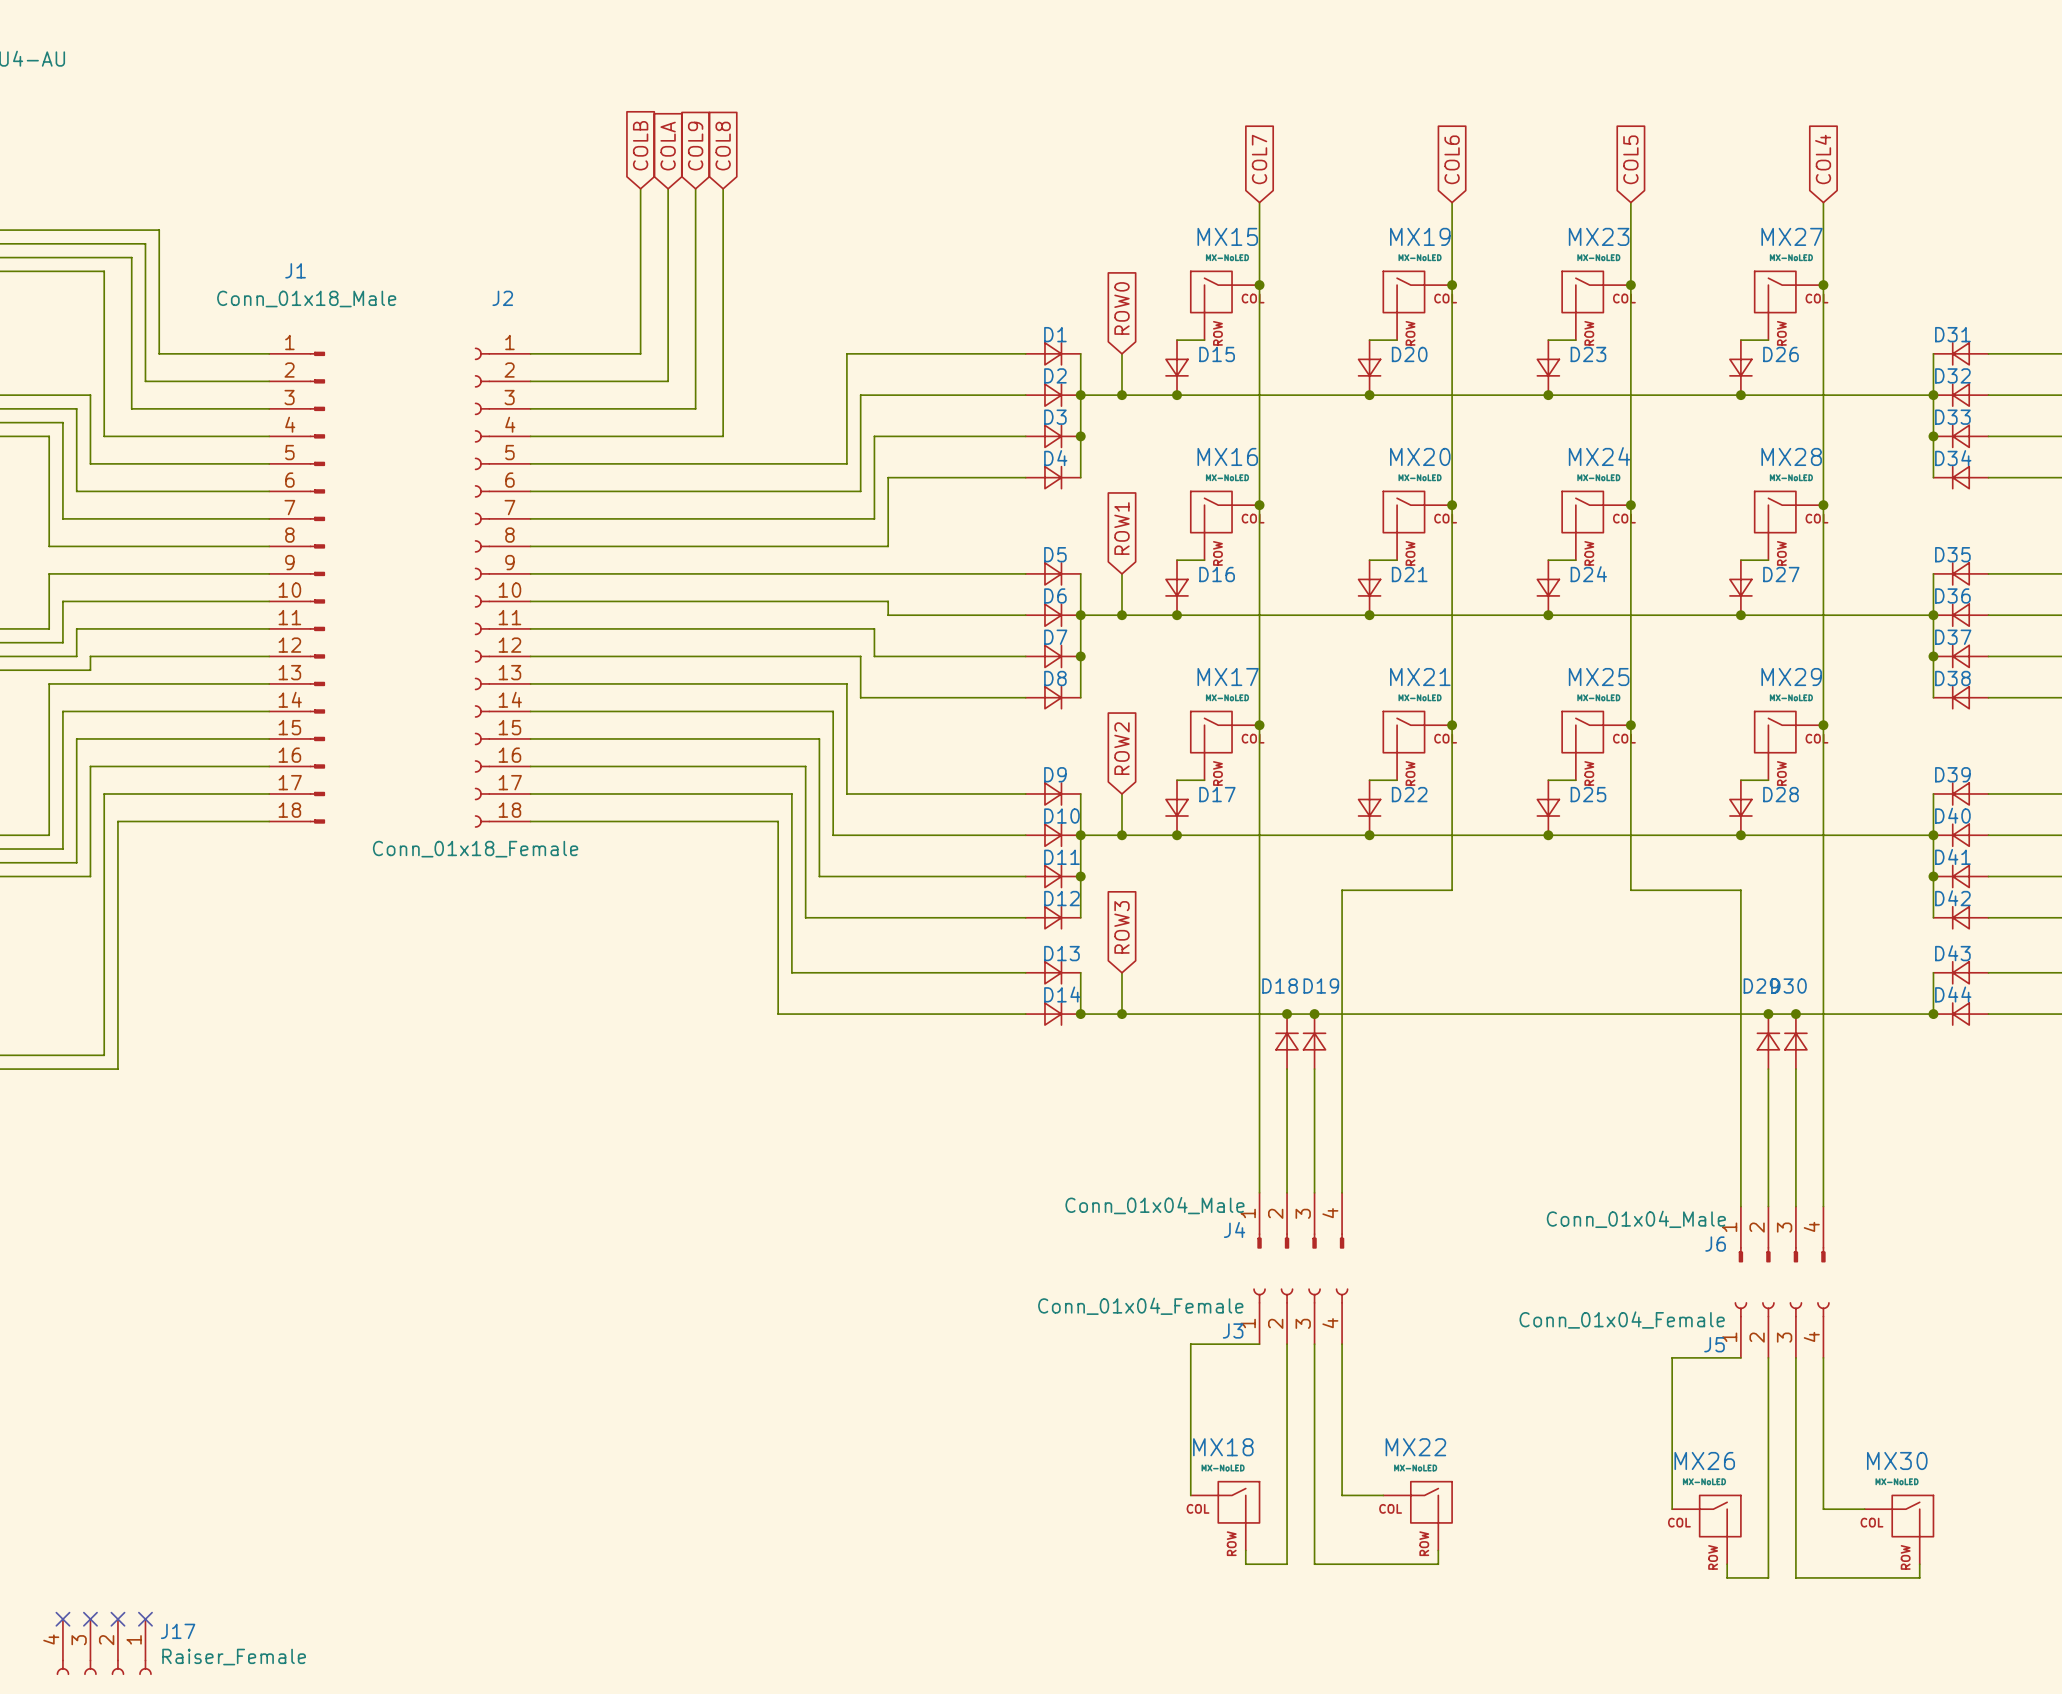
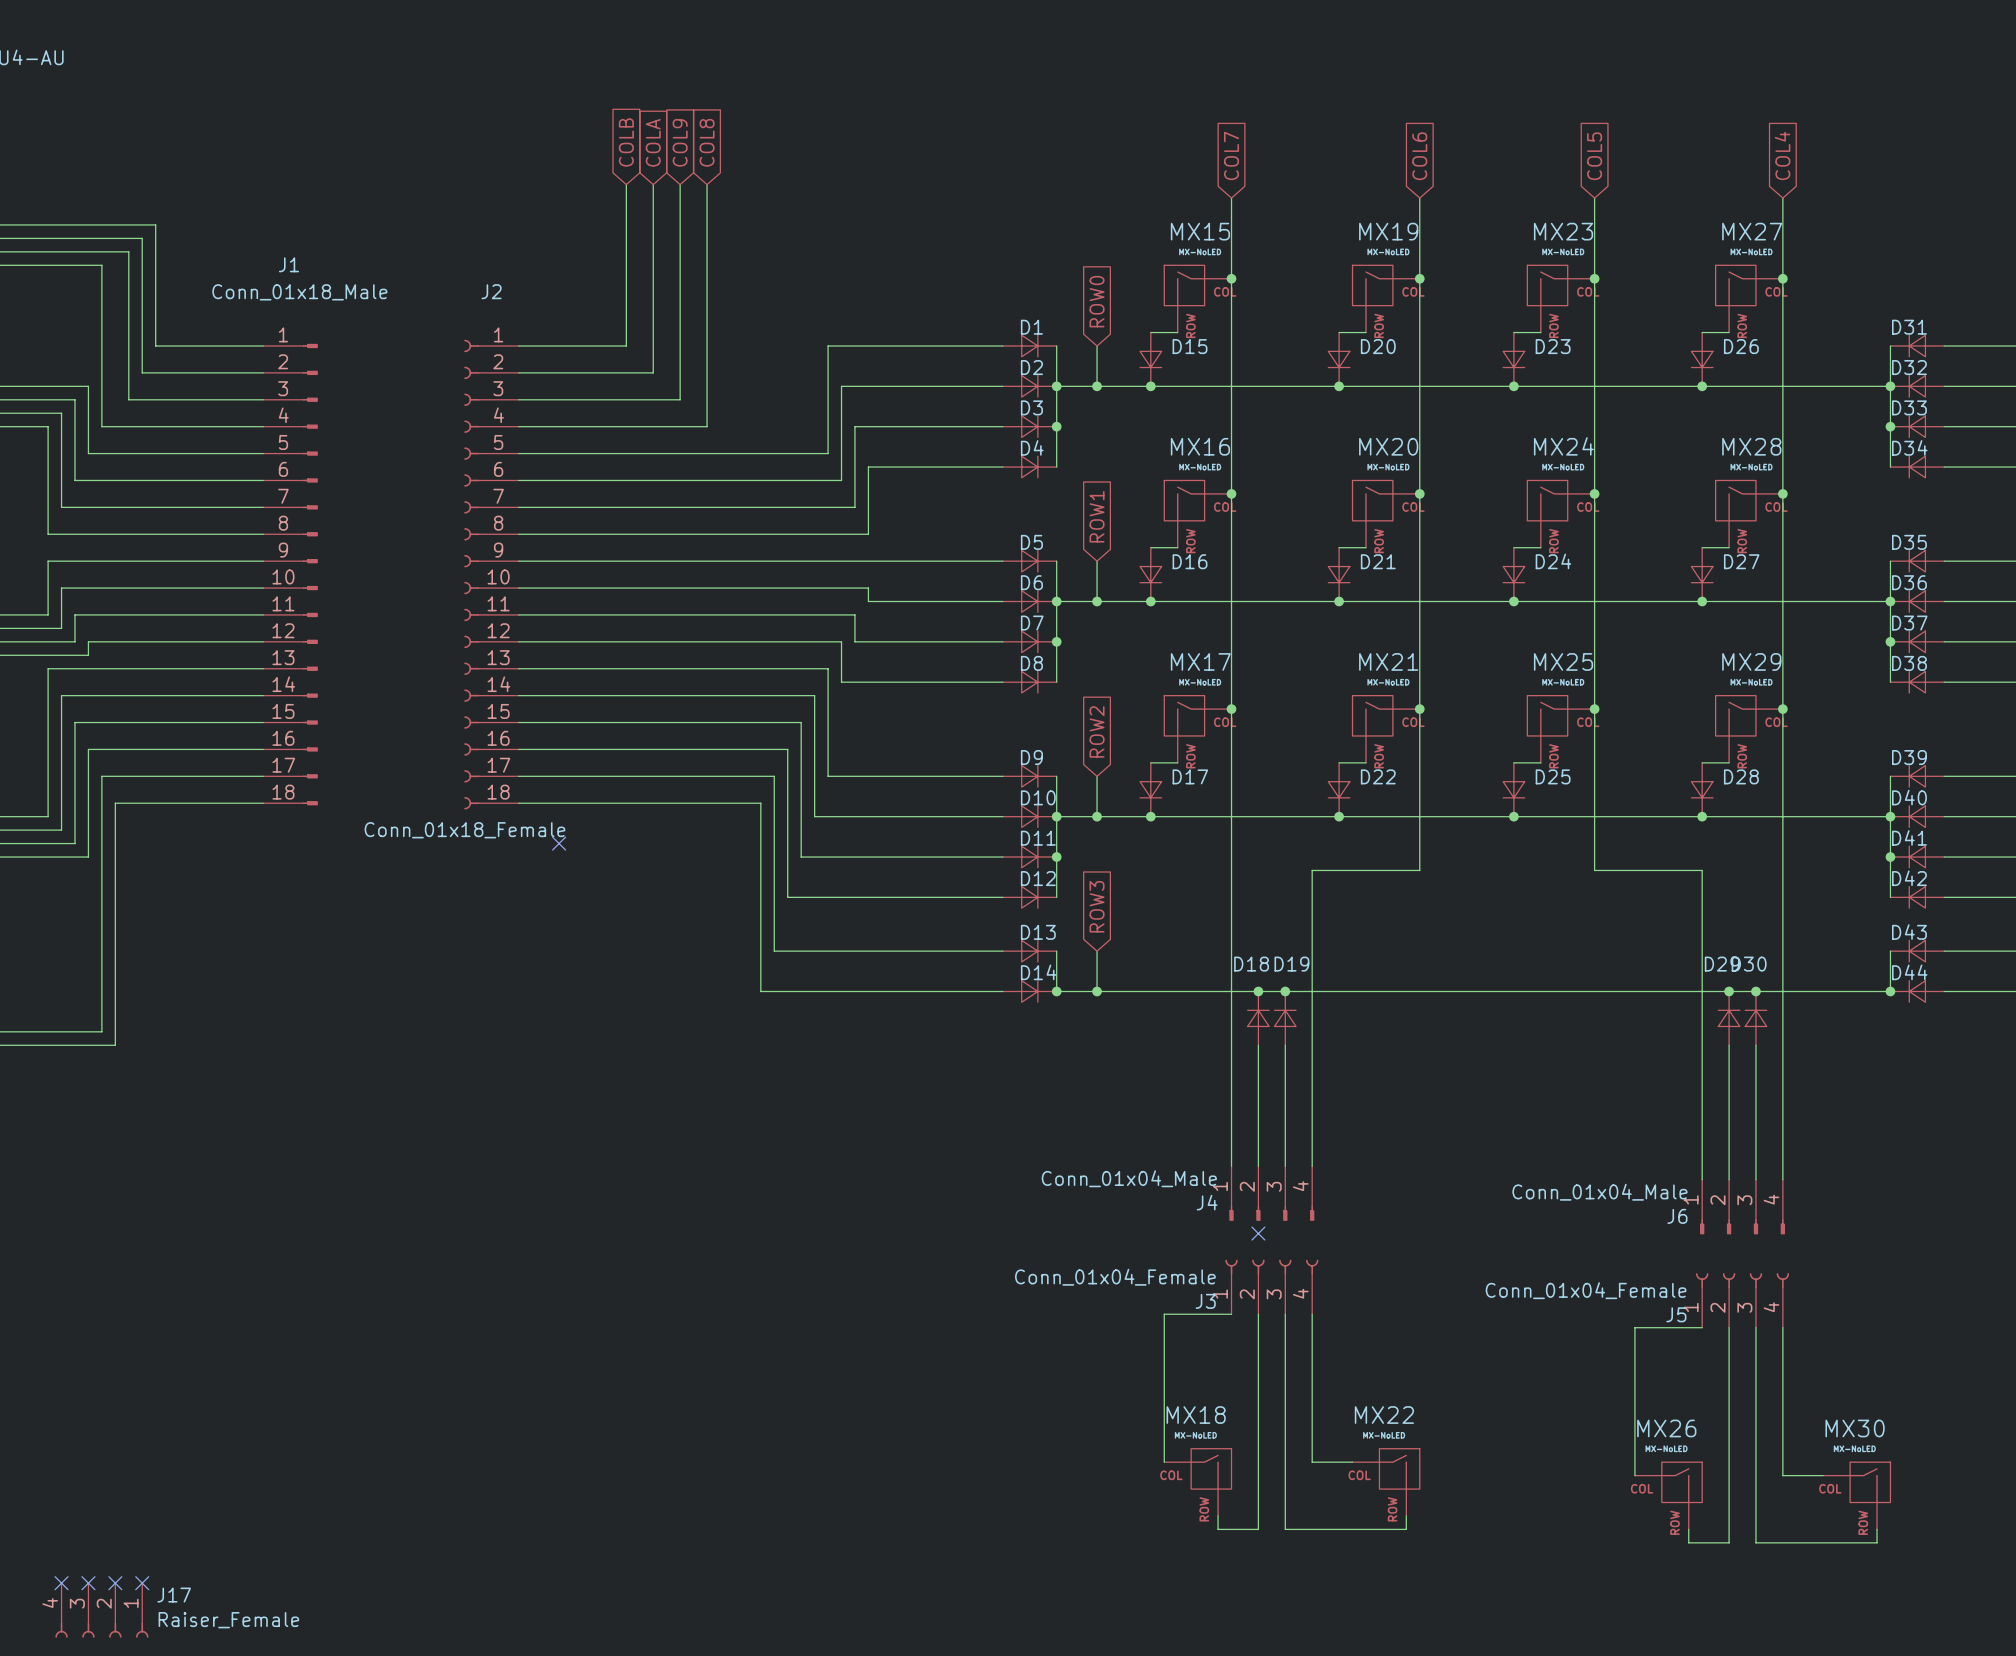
no-connect mark: none -> (559, 843)
no-connect mark: none -> (1258, 1233)

